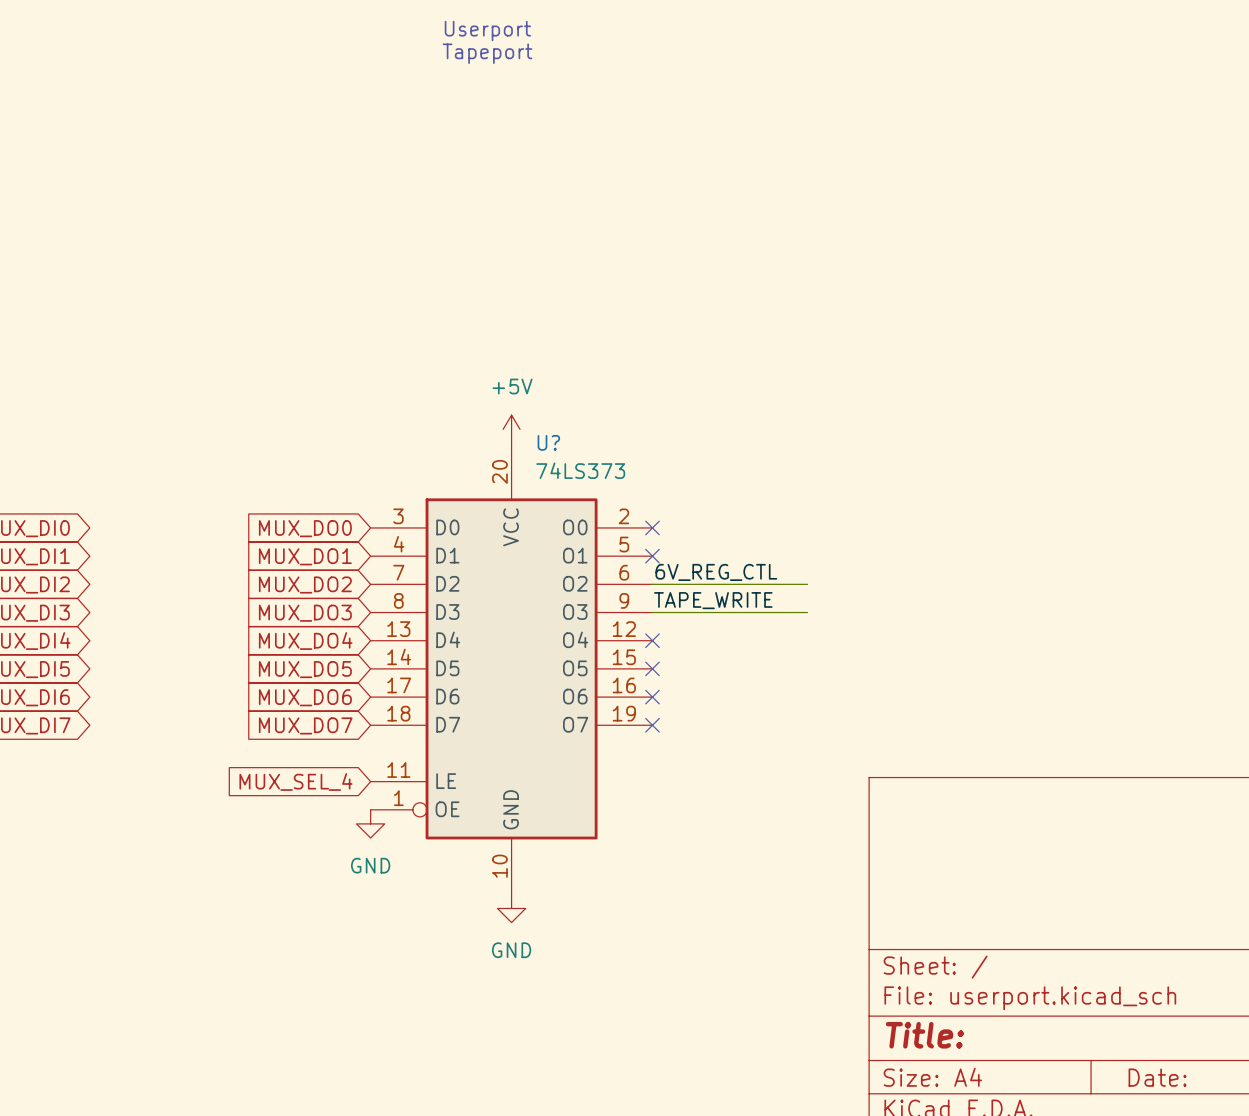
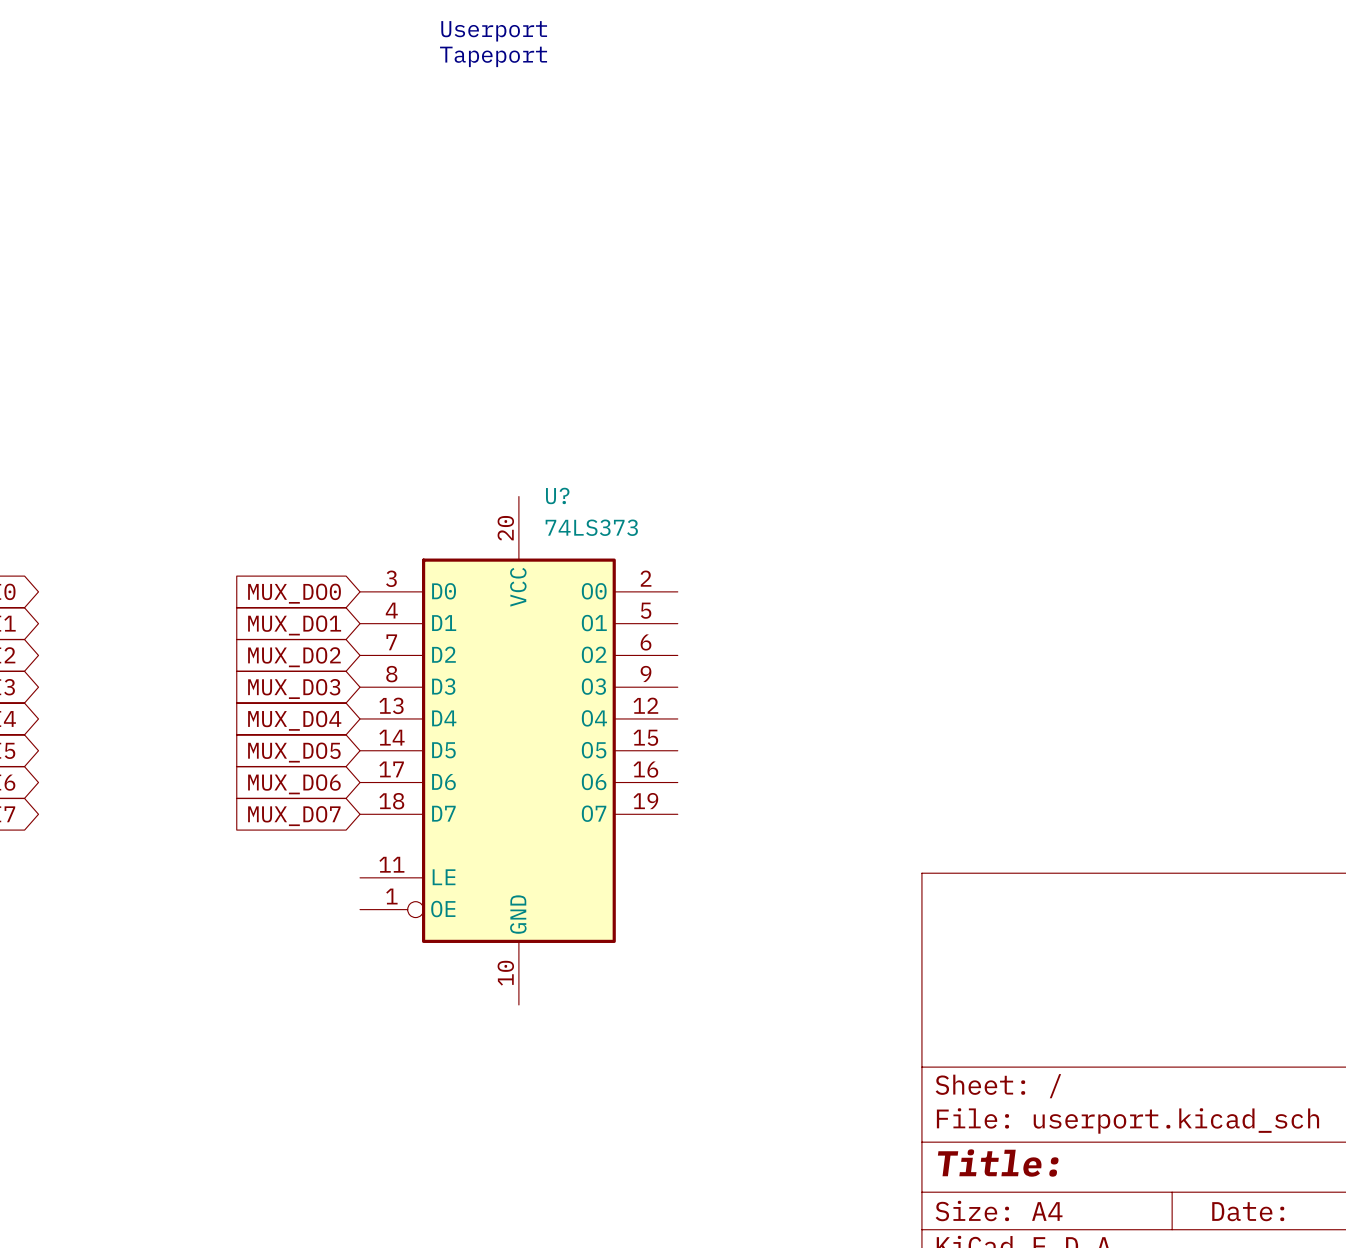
power symbol: +5V (511, 429) -> none
no-connect mark: (652, 527) -> none
no-connect mark: (652, 556) -> none
label: 6V_REG_CTL (716, 572) -> none
wire: (652, 584) (807, 584) -> none
label: TAPE_WRITE (713, 600) -> none
wire: (652, 612) (807, 612) -> none
no-connect mark: (652, 640) -> none
no-connect mark: (652, 668) -> none
no-connect mark: (652, 697) -> none
no-connect mark: (652, 725) -> none
global label: MUX_SEL_4 (295, 781) -> none
power symbol: GND (370, 823) -> none
power symbol: GND (511, 908) -> none

